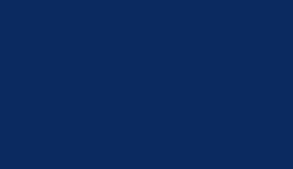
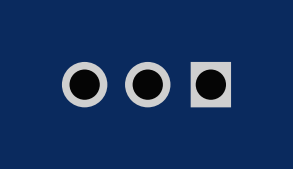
part: none -> (146, 84)

